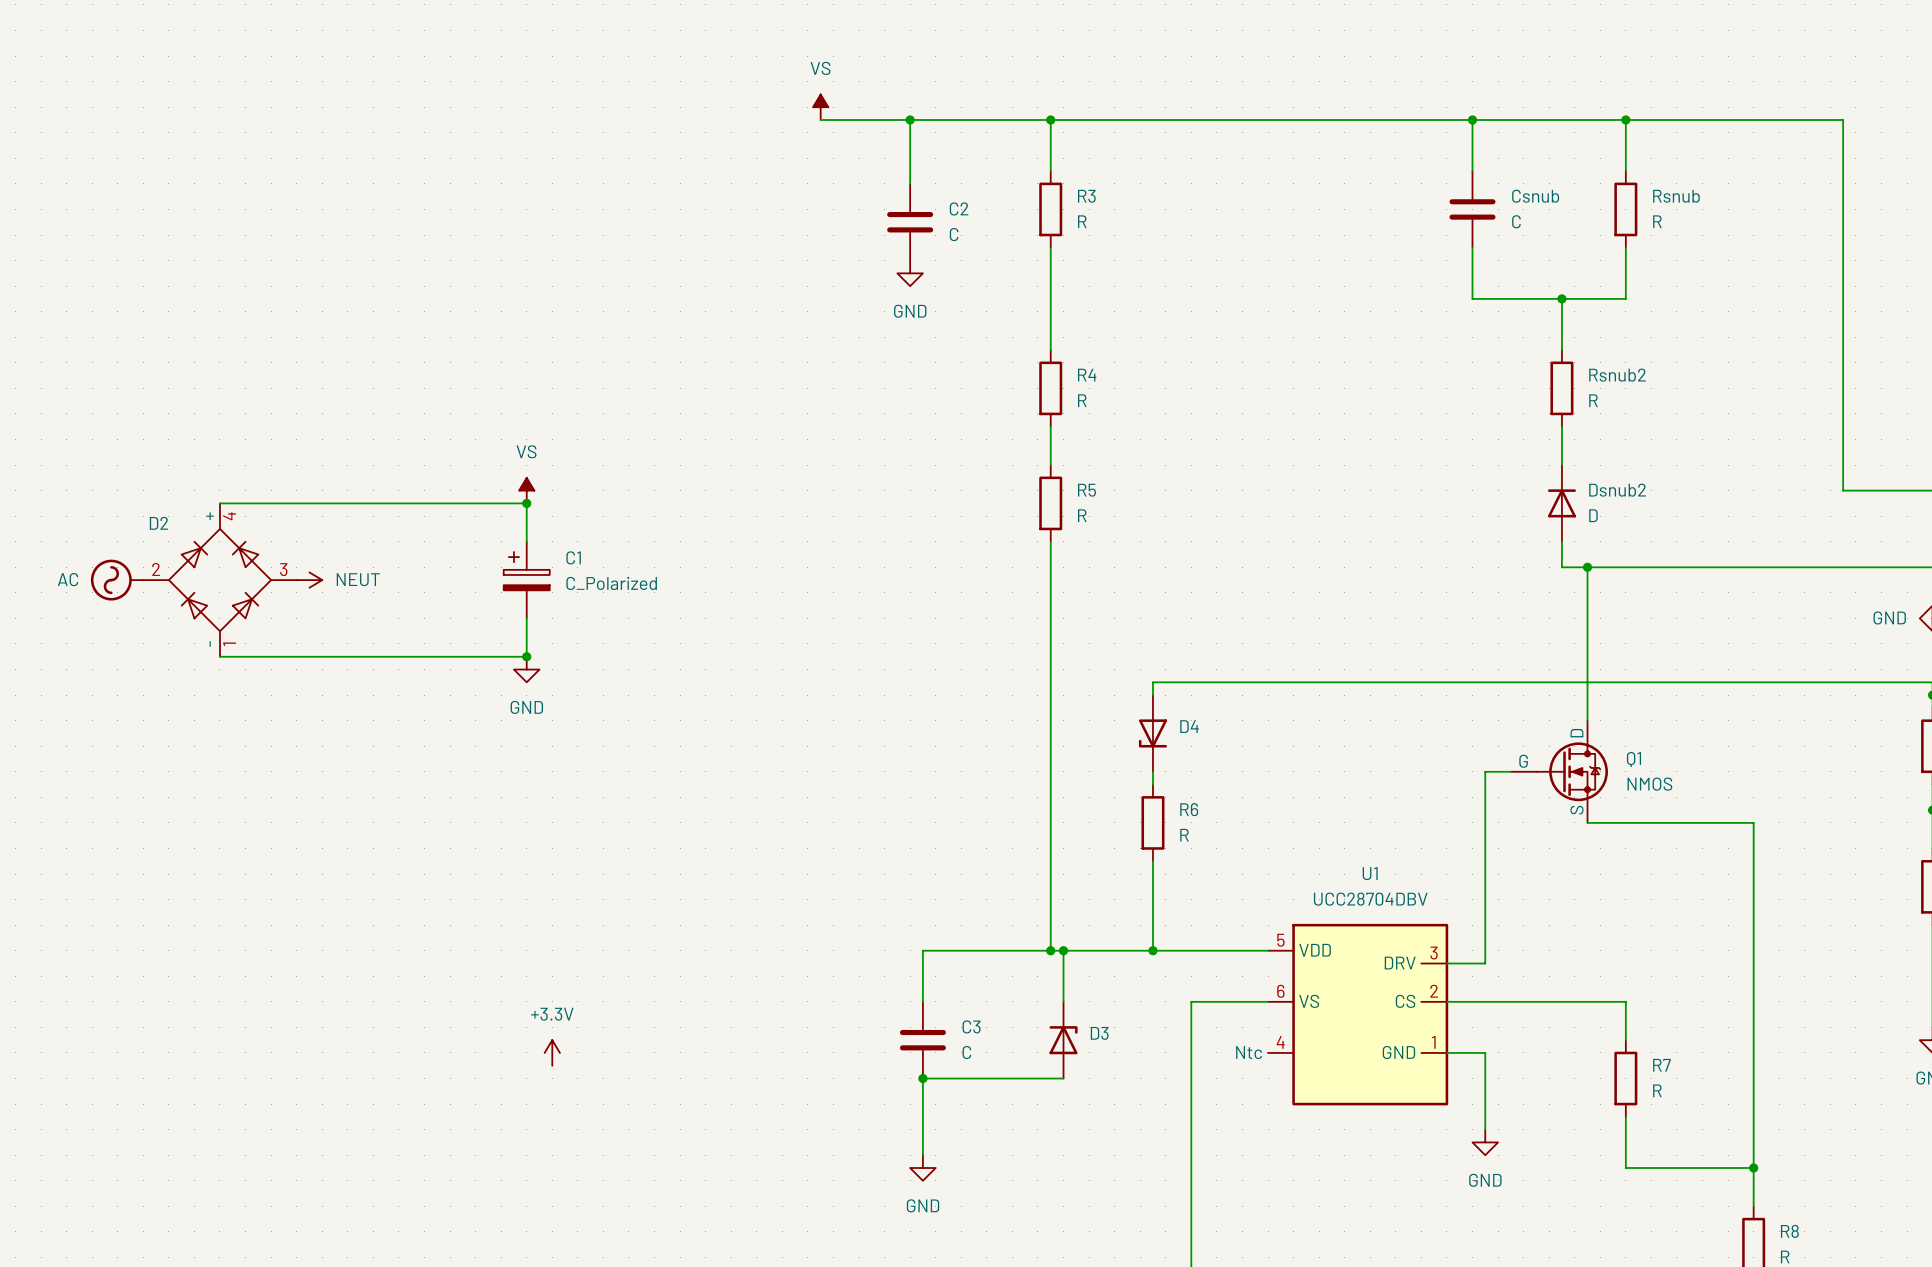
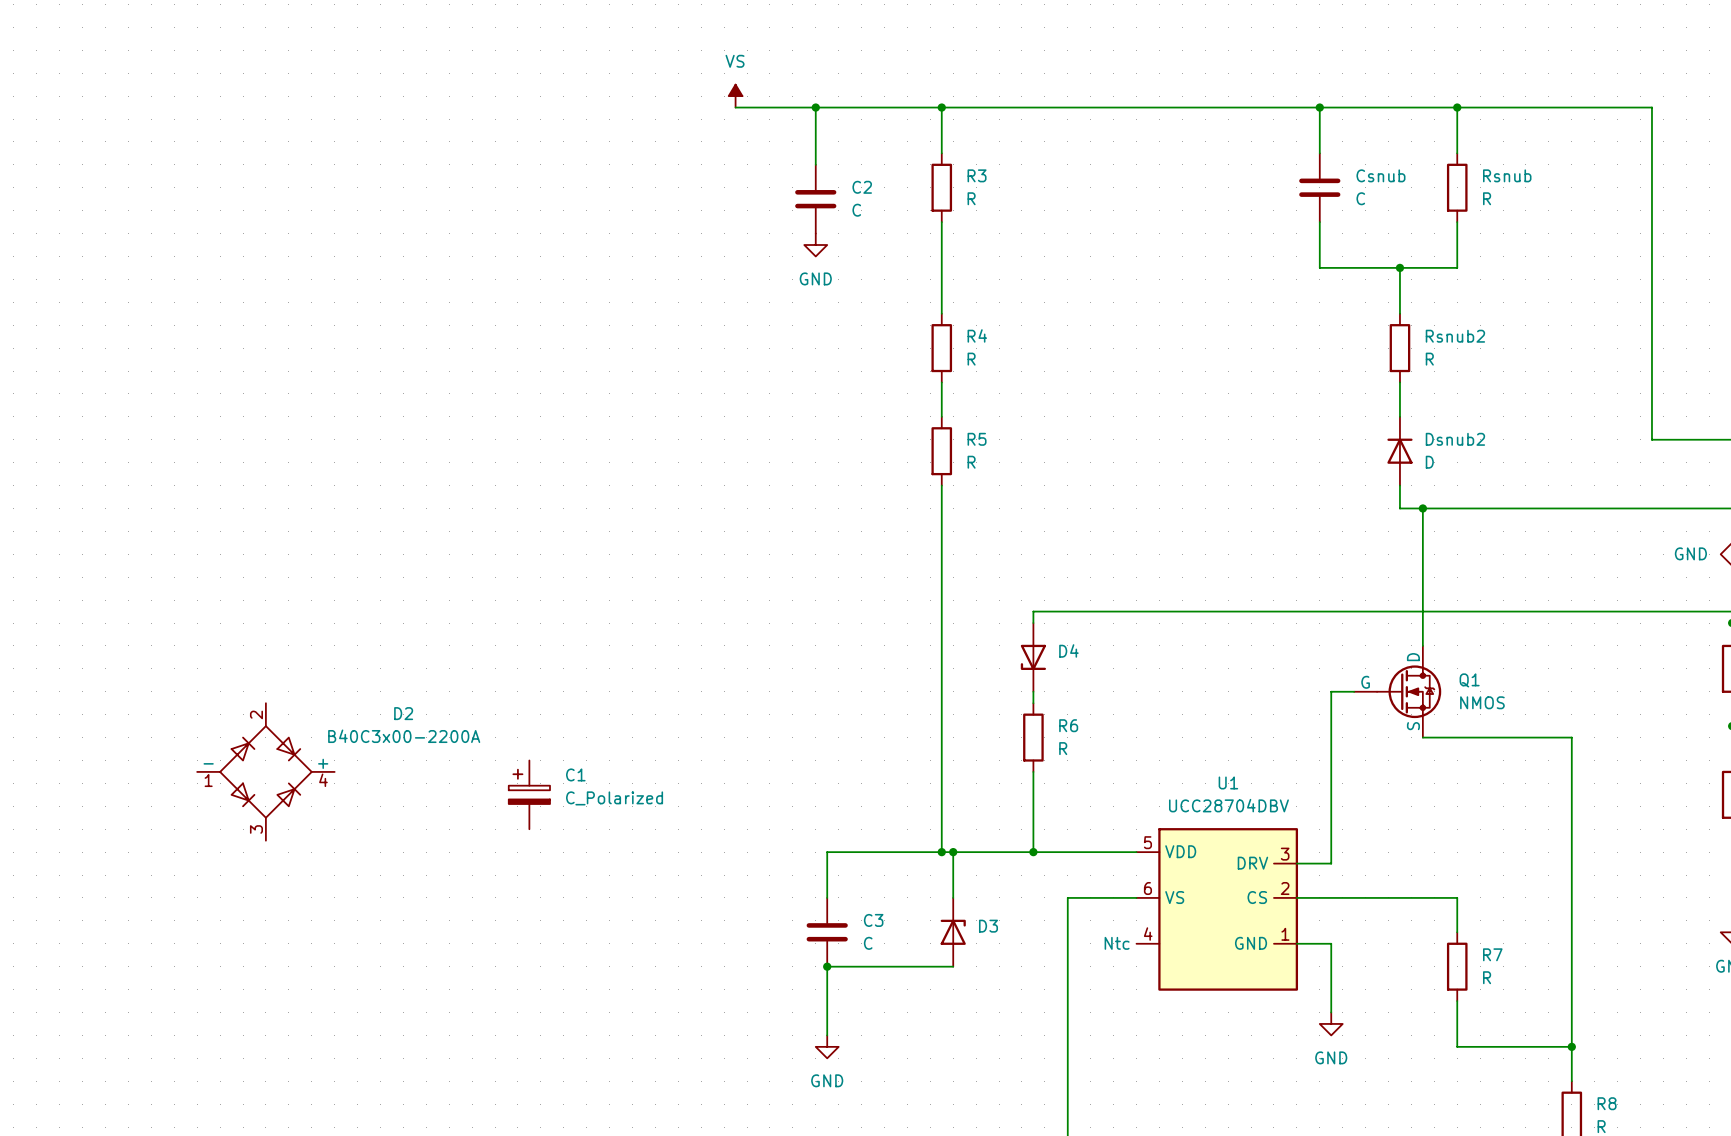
power symbol: VS (526, 490) -> none
wire: (219, 503) (526, 503) (526, 541) -> none
junction: (526, 503) -> none
D2 name position: D2 (158, 523) -> D2 (403, 713)
power symbol: AC (117, 580) -> none
D2 rotation: 0° (219, 580) -> 90° clockwise (265, 771)
D2 position: (219, 580) -> (265, 771)
power symbol: NEUT (309, 580) -> none
C1 position: (526, 580) -> (529, 794)
wire: (526, 618) (526, 656) (219, 656) -> none
junction: (526, 656) -> none
power symbol: GND (526, 669) -> none
D2 value: none -> B40C3x00-2200A (404, 736)
power symbol: +3.3V (552, 1052) -> none

